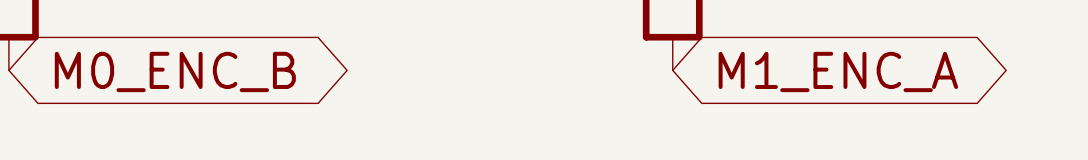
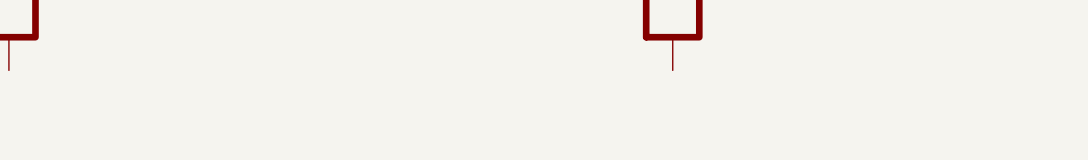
global label: M0_ENC_B (175, 71) -> none
global label: M1_ENC_A (838, 71) -> none

